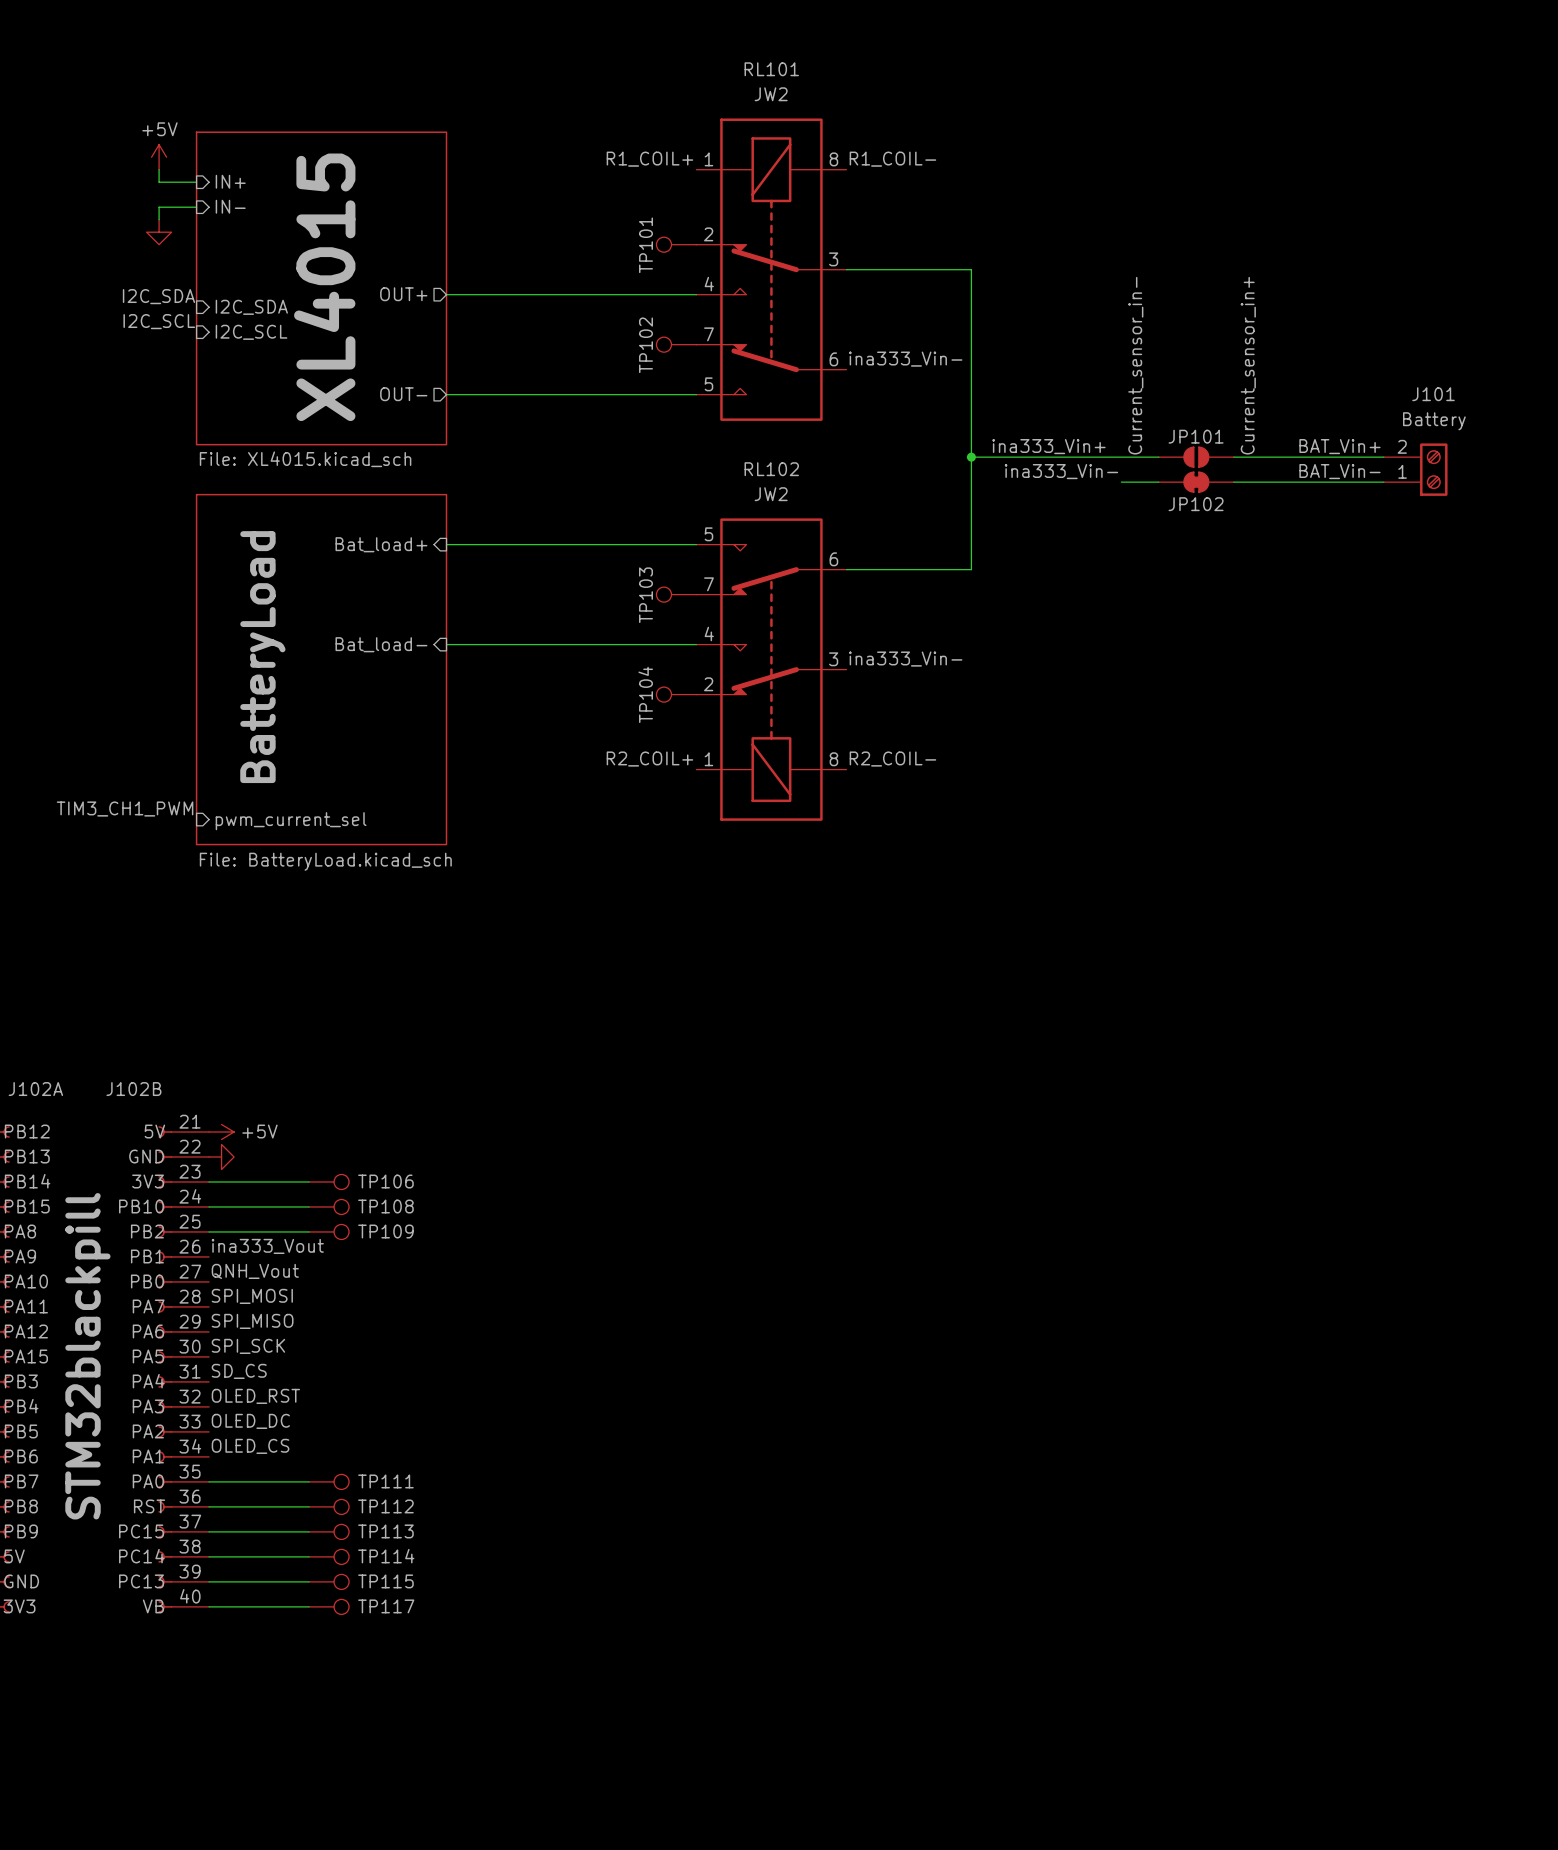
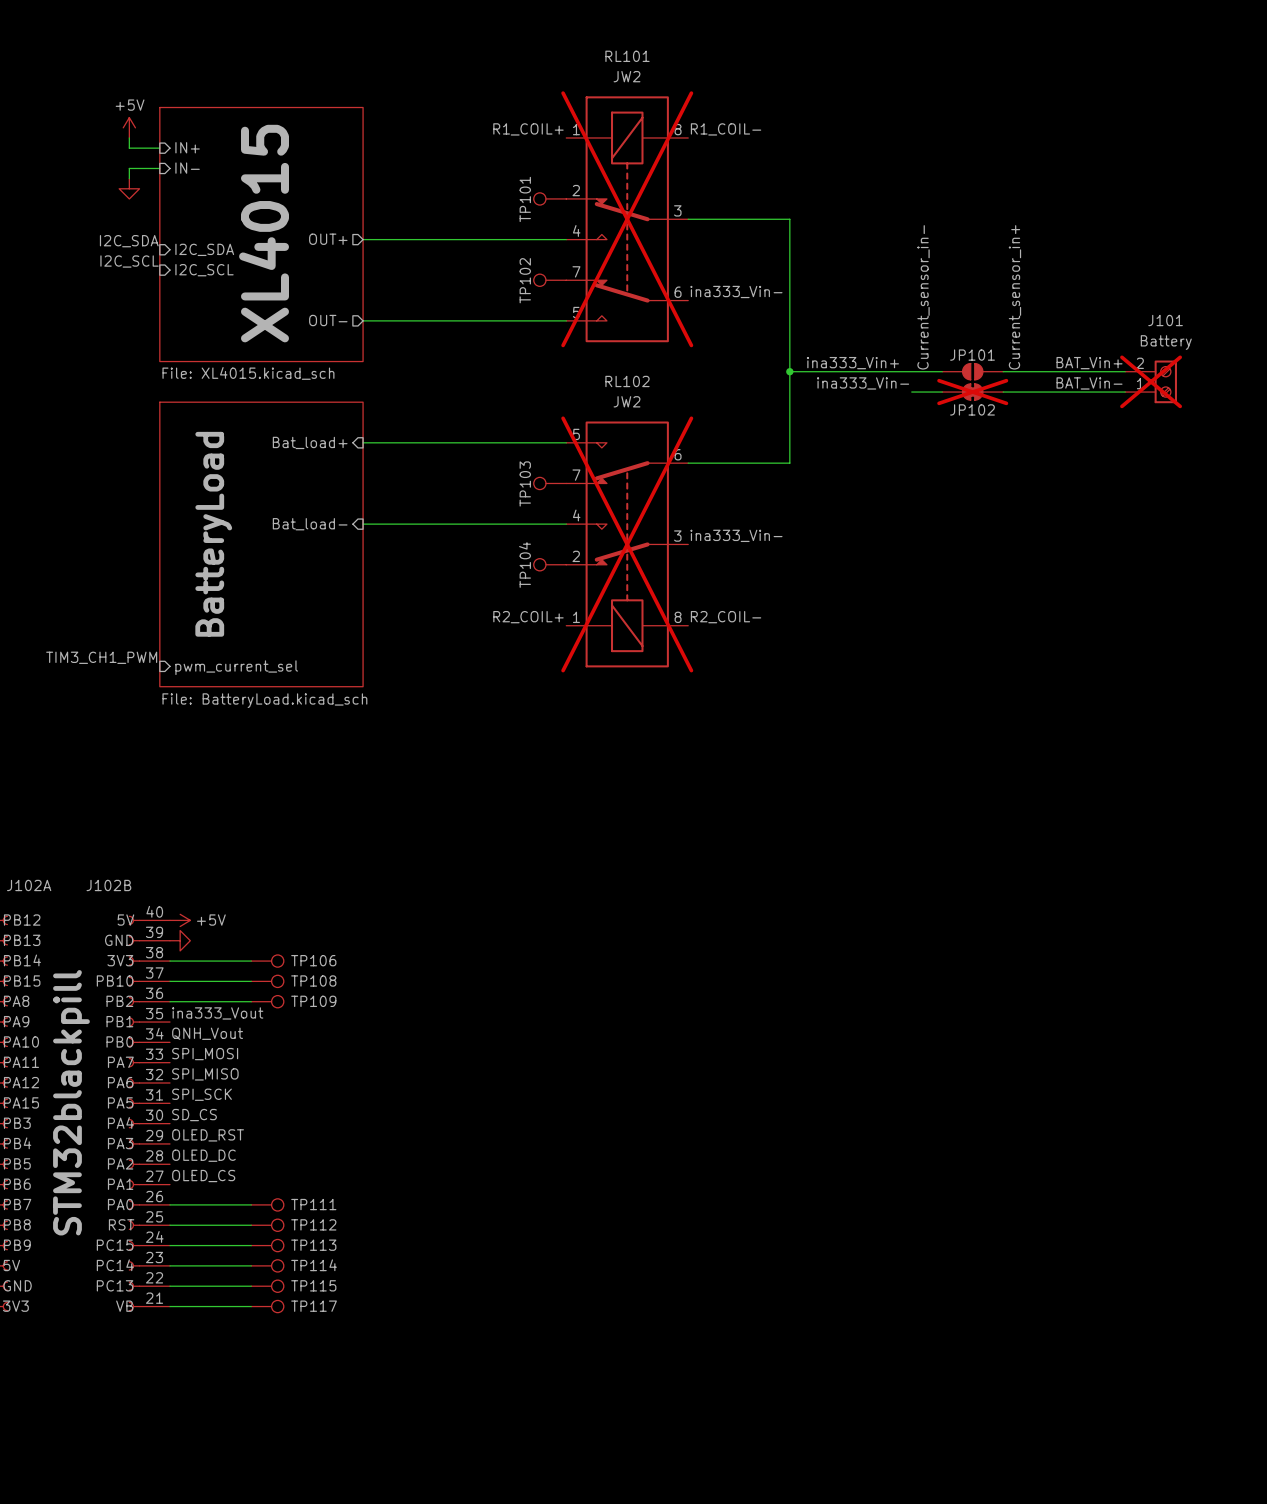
RL101 do-not-place cross: none -> (627, 219)
J101 do-not-place cross: none -> (1151, 381)
JP102 do-not-place cross: none -> (972, 392)
RL102 do-not-place cross: none -> (627, 544)
J102B symbol: [158, 1126, 210, 1613] -> [128, 915, 170, 1312]

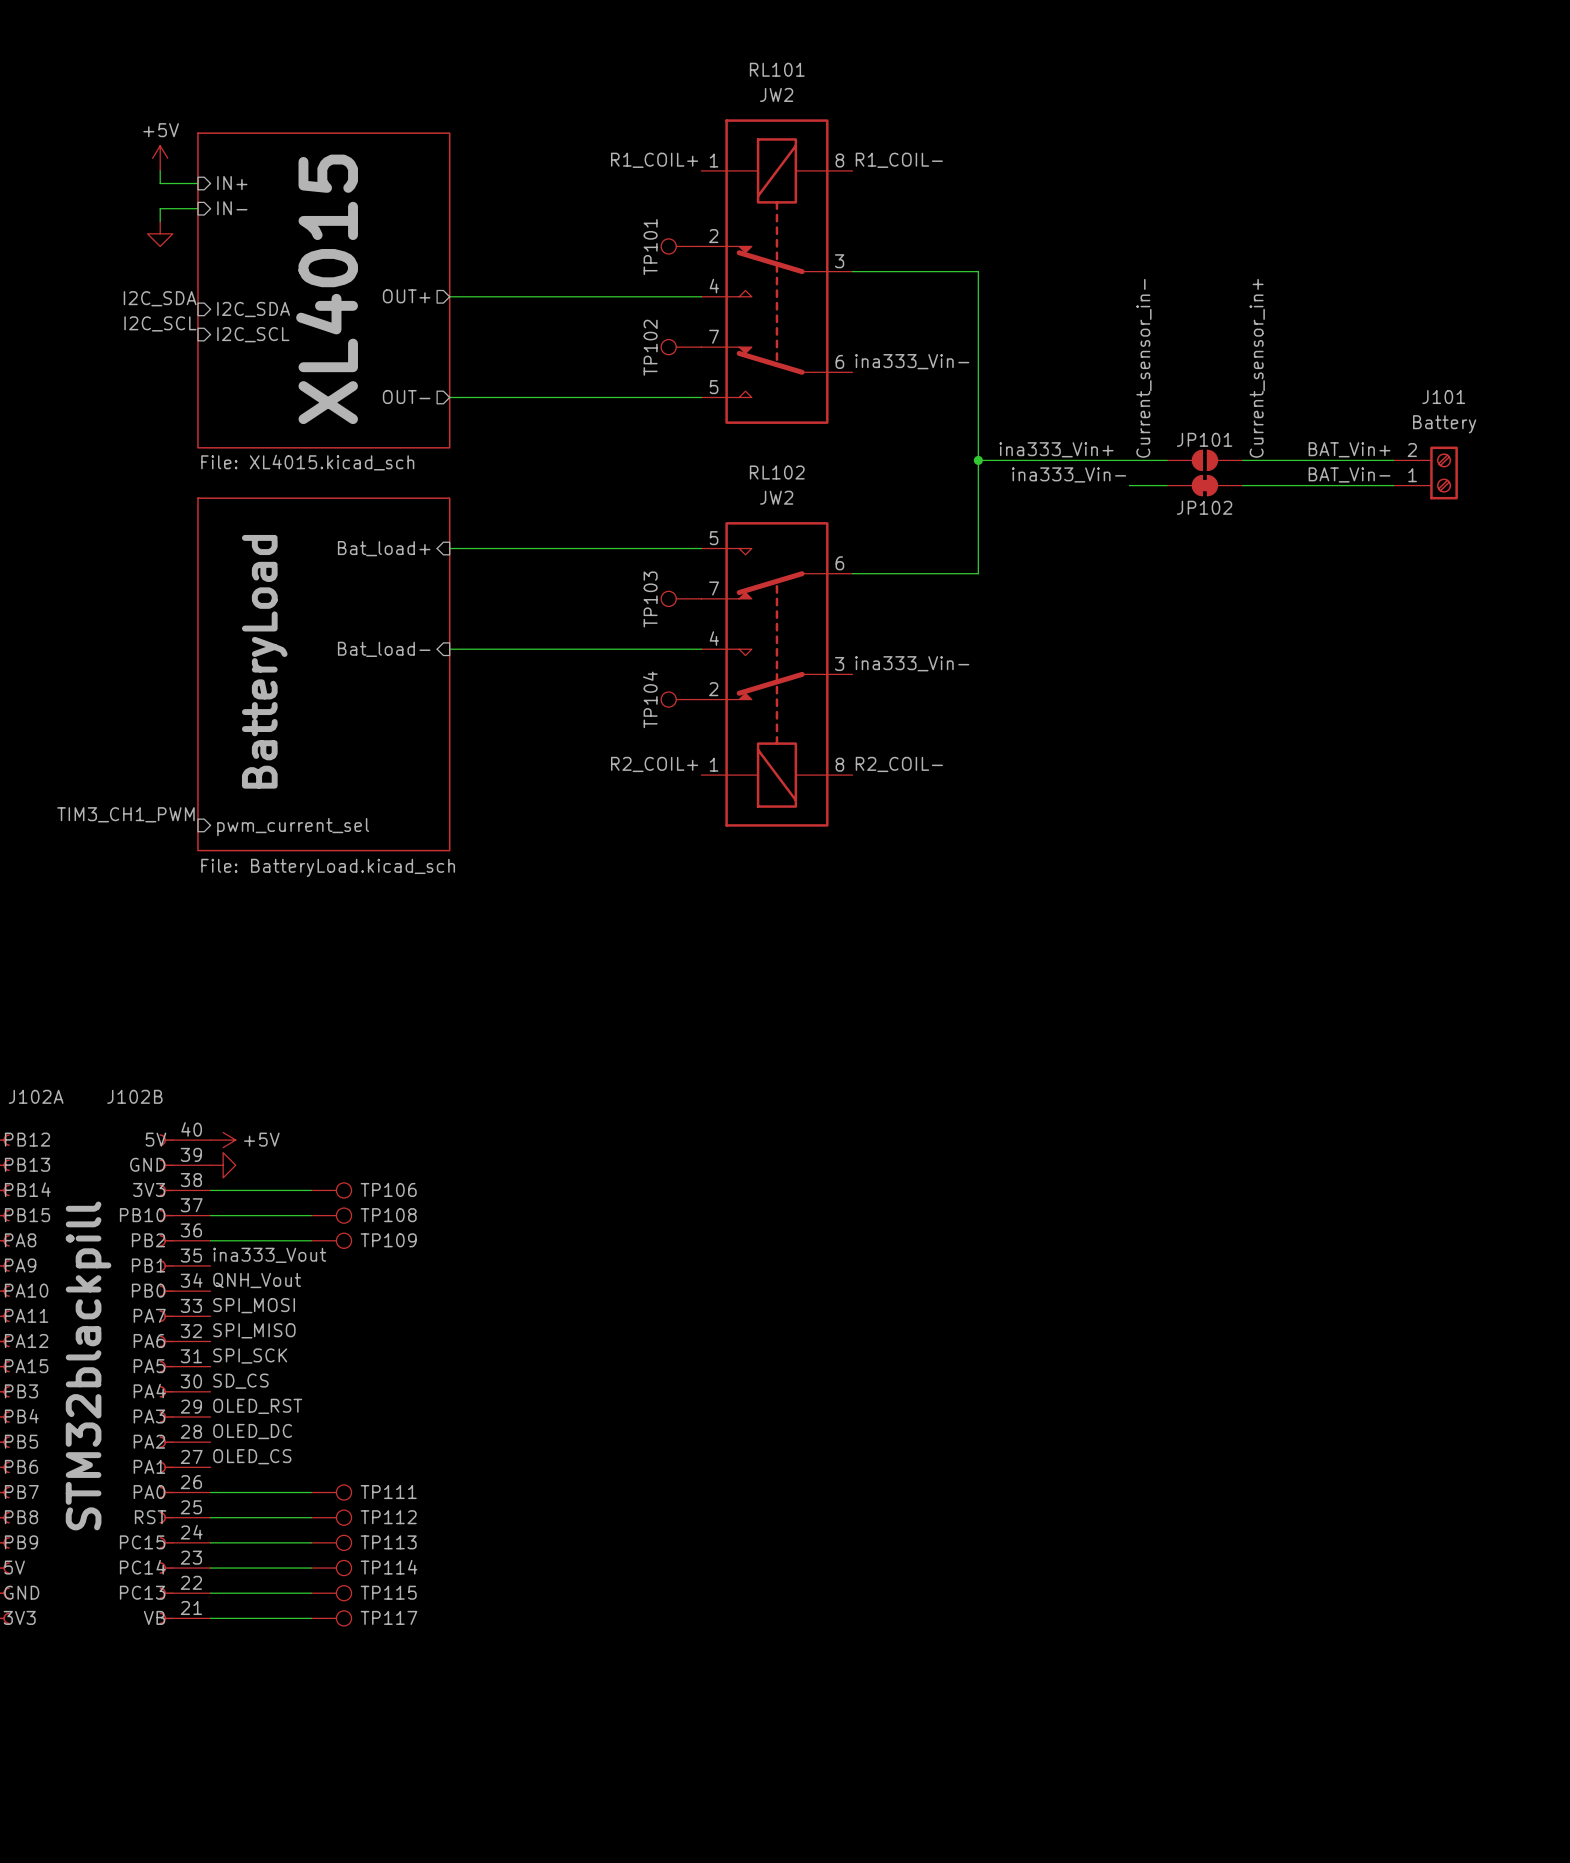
RL101 do-not-place cross: (627, 219) -> none
J101 do-not-place cross: (1151, 381) -> none
JP102 do-not-place cross: (972, 392) -> none
RL102 do-not-place cross: (627, 544) -> none

